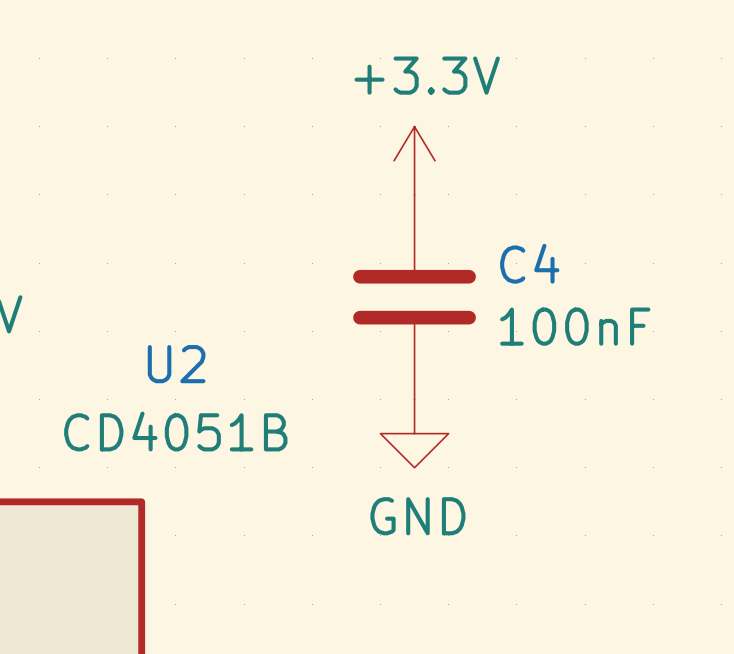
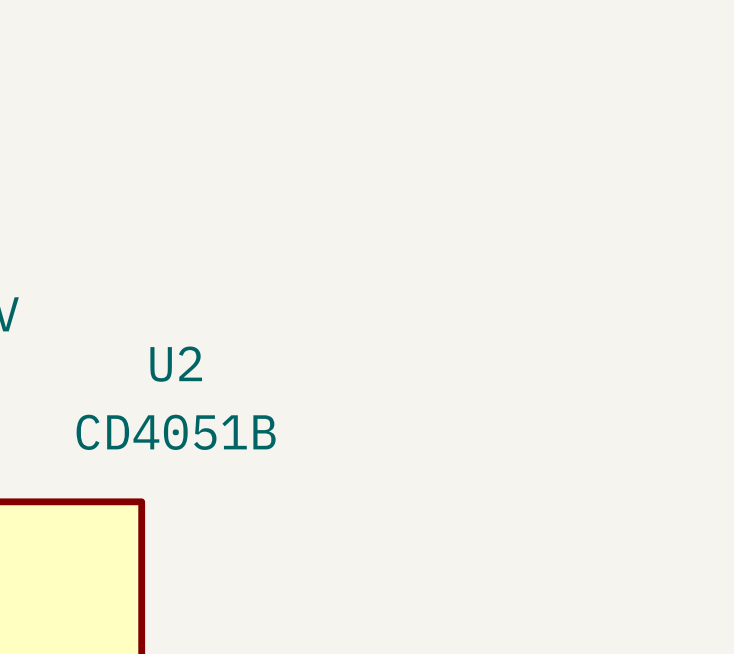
power symbol: +3.3V (414, 160) -> none
C4: 100nF (414, 297) -> none
power symbol: GND (414, 433) -> none

